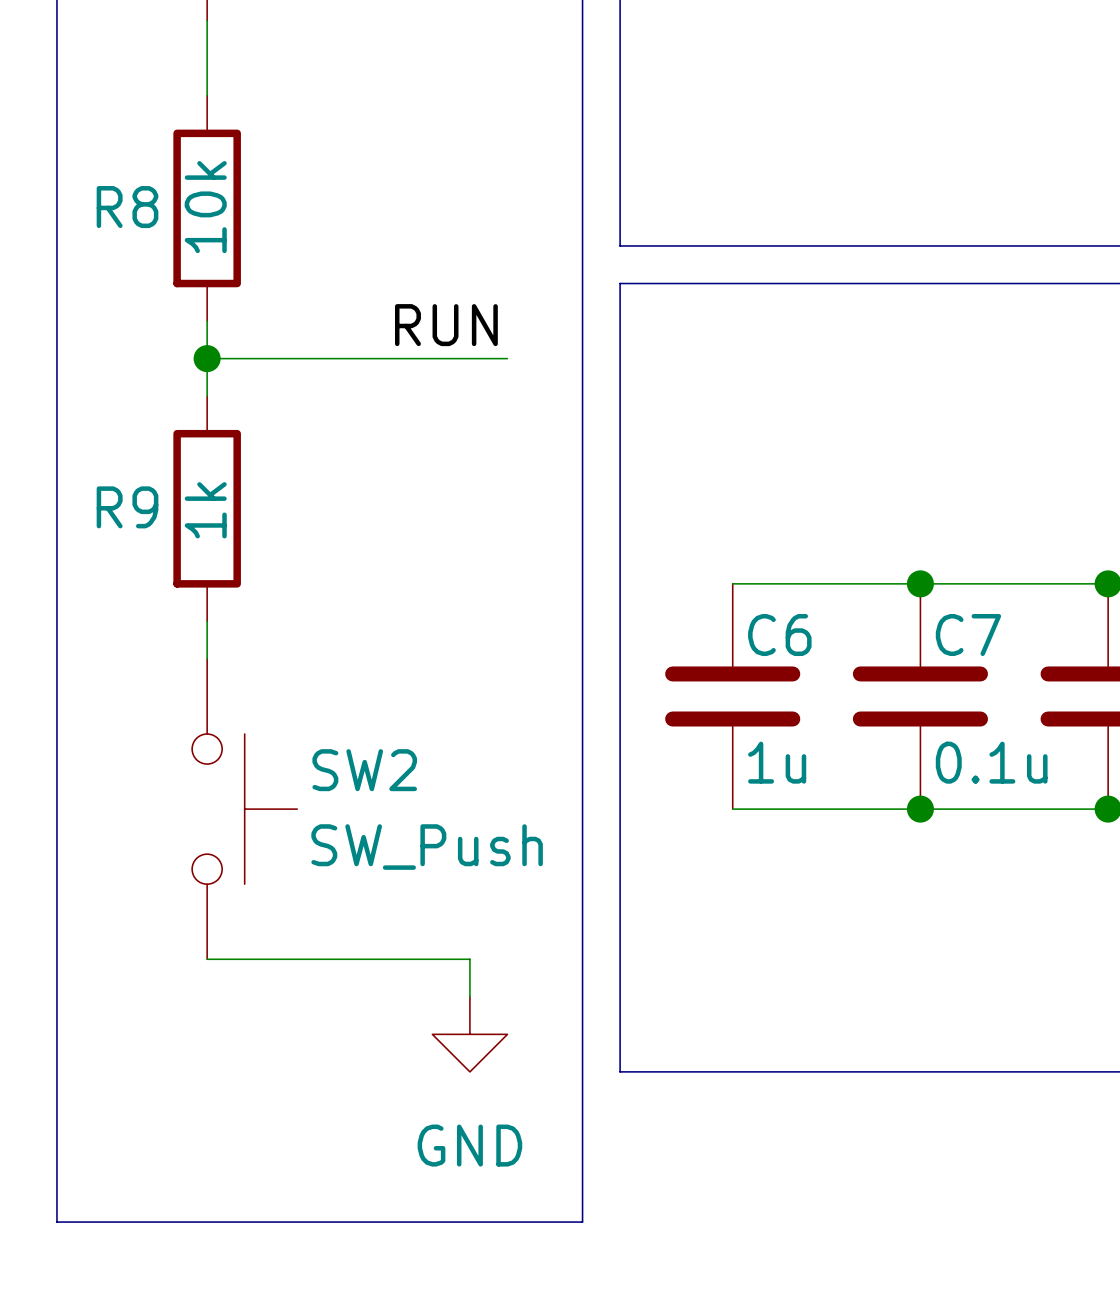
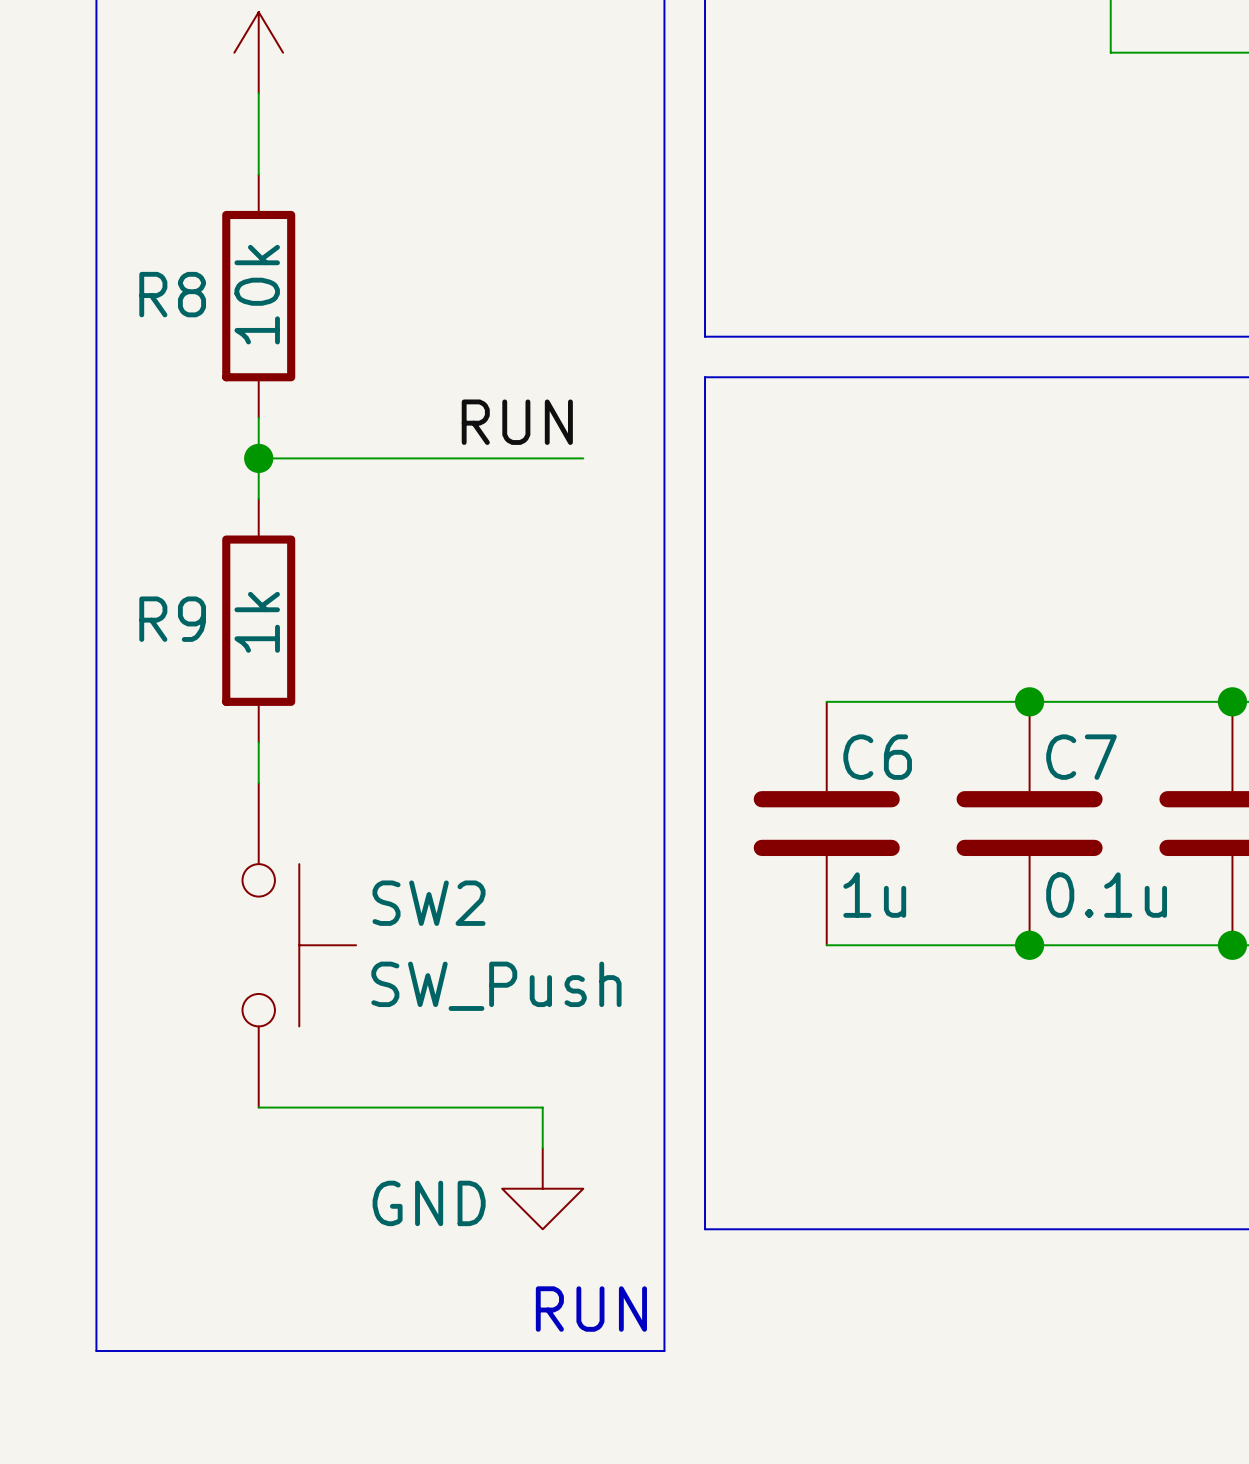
power symbol text position: GND (469, 1145) -> GND (429, 1203)
text: none -> RUN (591, 1309)
line: (56, 1184) (56, 1222) (582, 1222) (582, 1184) -> (96, 1350) (664, 1350)

